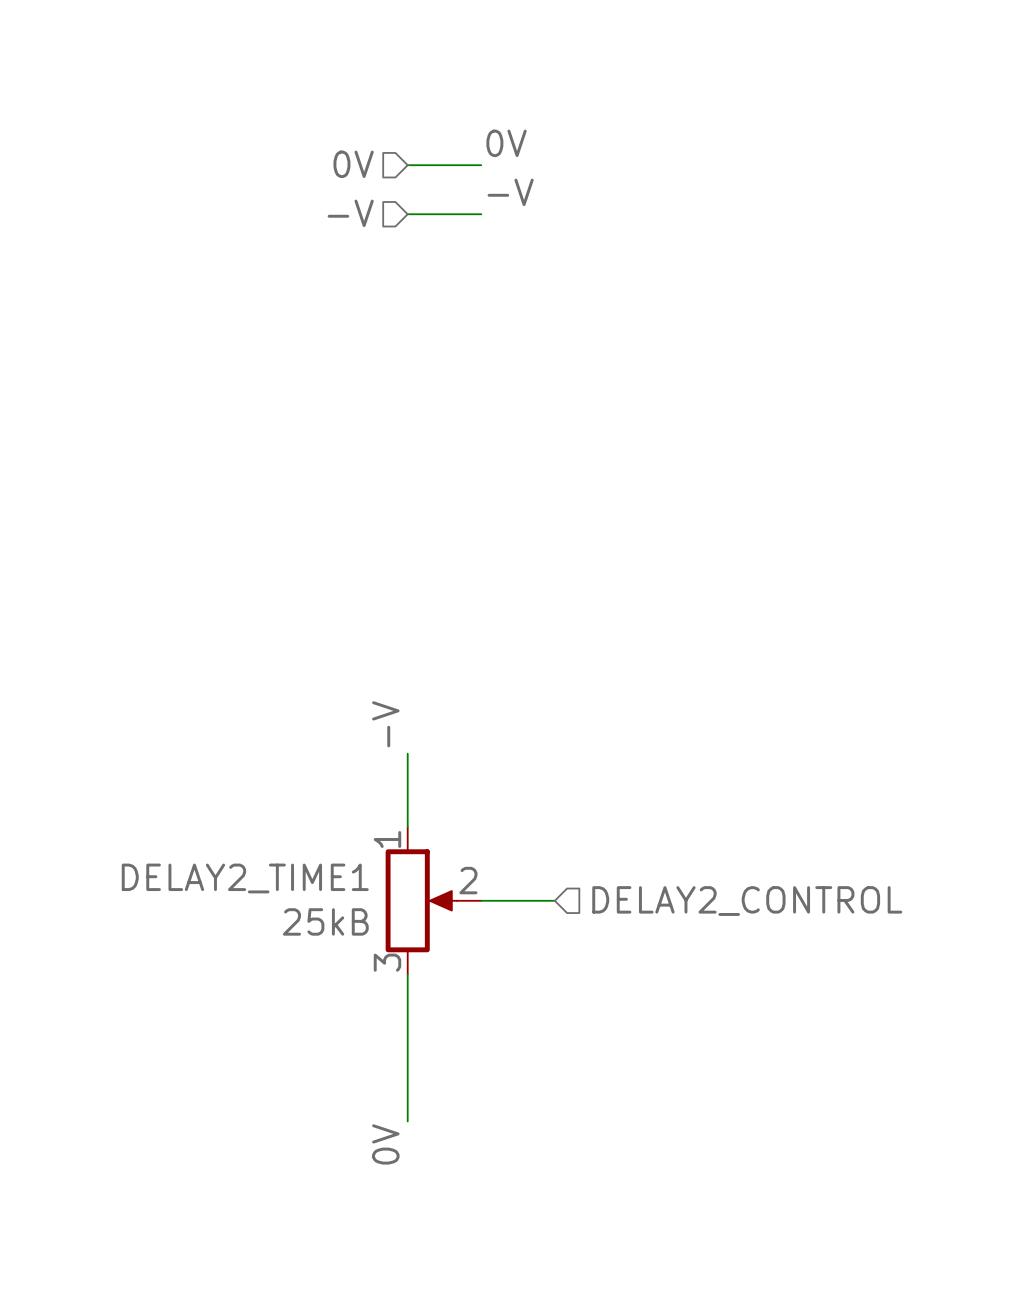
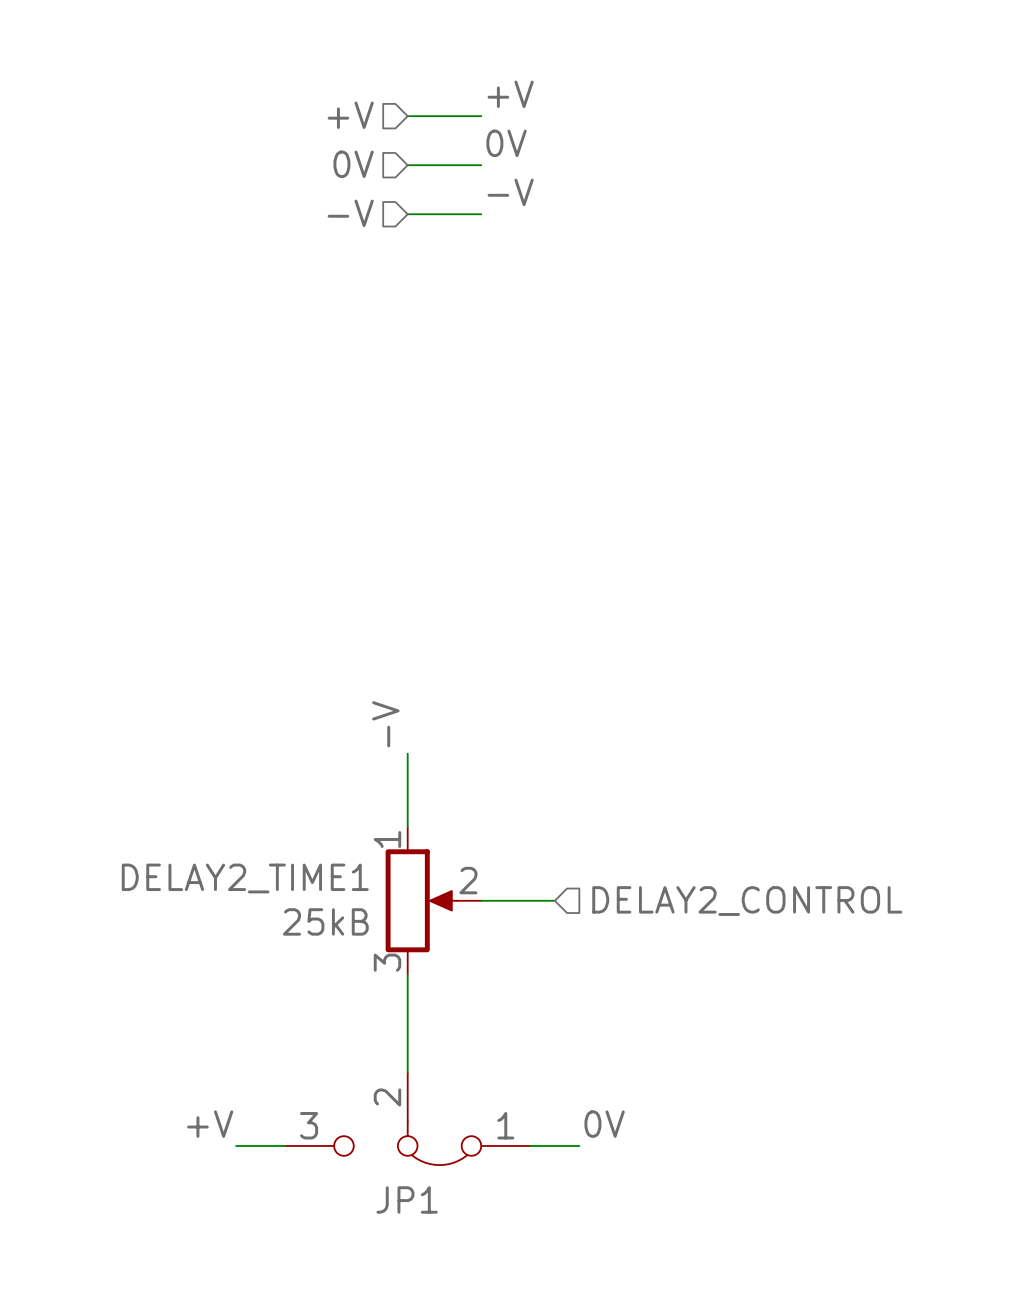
label: none -> +V (510, 94)
hierarchical label: none -> +V (350, 115)
wire: none -> (407, 116) (481, 116)
JP1: none -> (407, 1118)
label: none -> +V (210, 1124)
label rotation: 0° (385, 1144) -> 90° clockwise (604, 1124)
label position: 0V (385, 1144) -> 0V (604, 1124)
wire: none -> (236, 1145) (285, 1145)
wire: none -> (530, 1145) (579, 1145)

